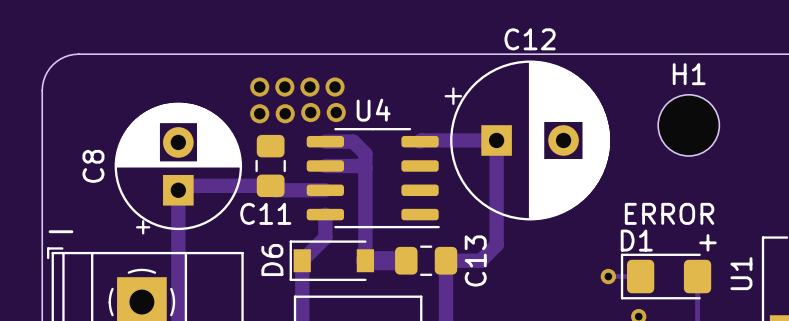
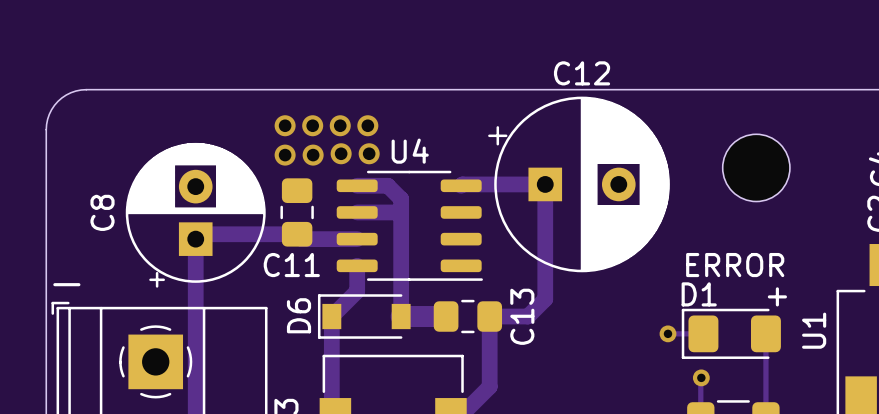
H1 name: H1 (689, 74) -> none

